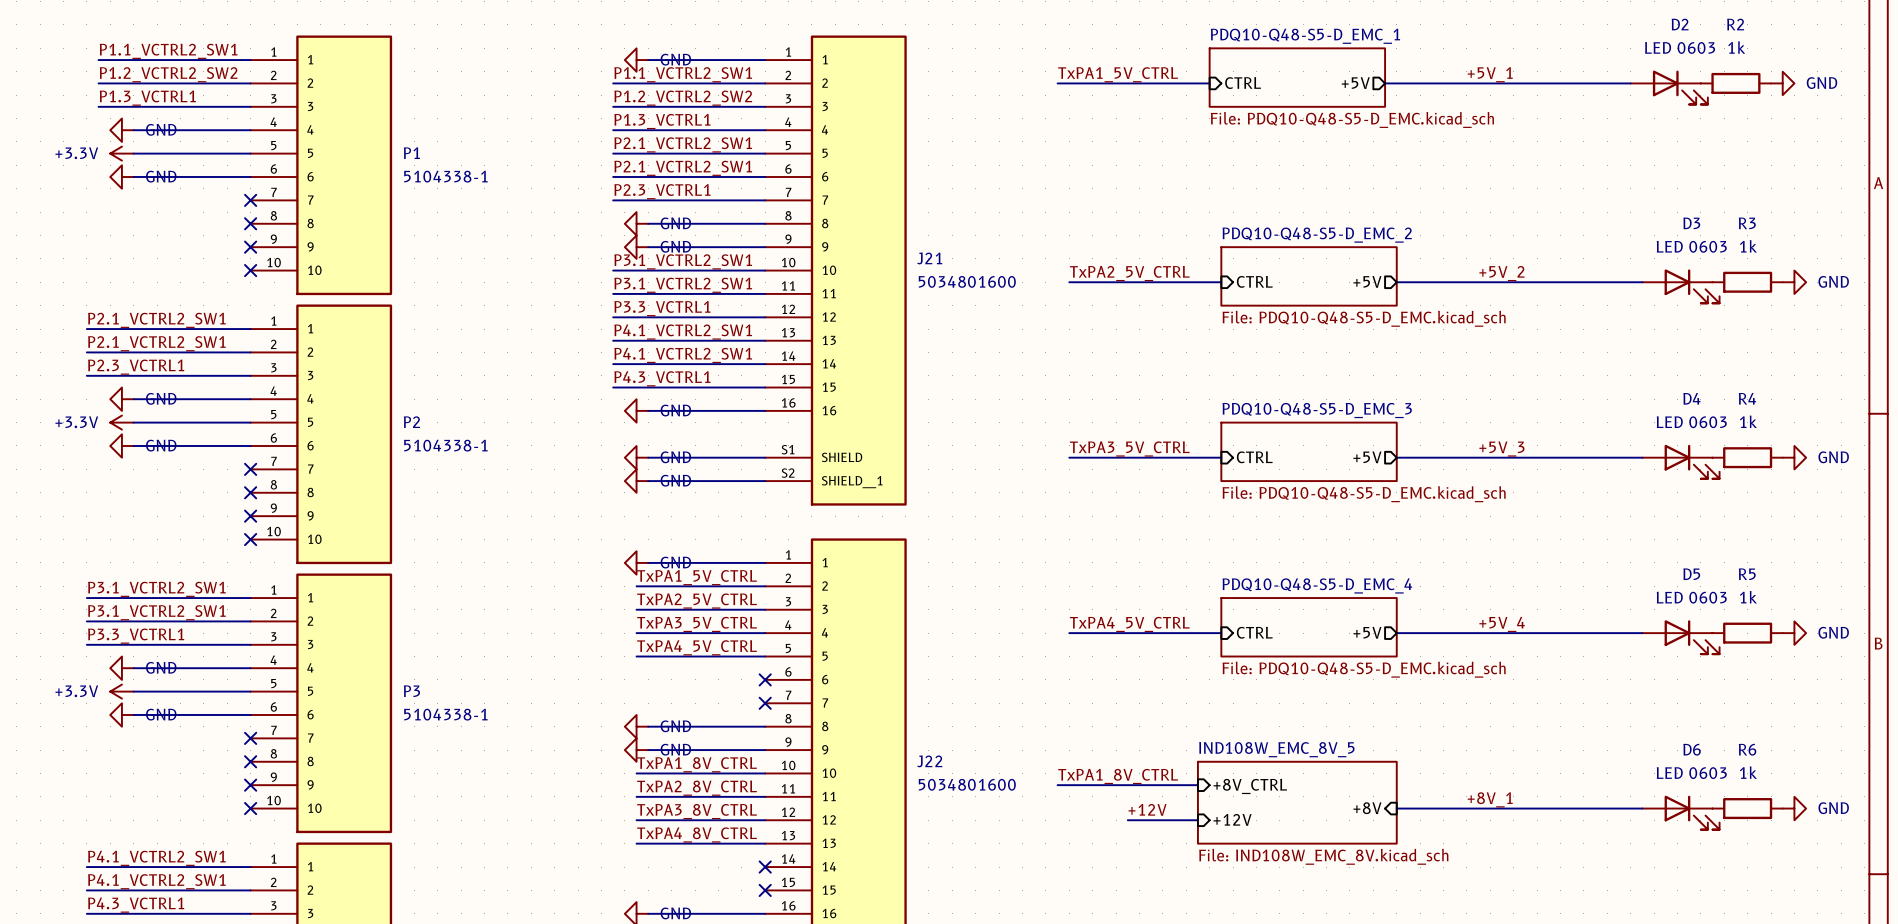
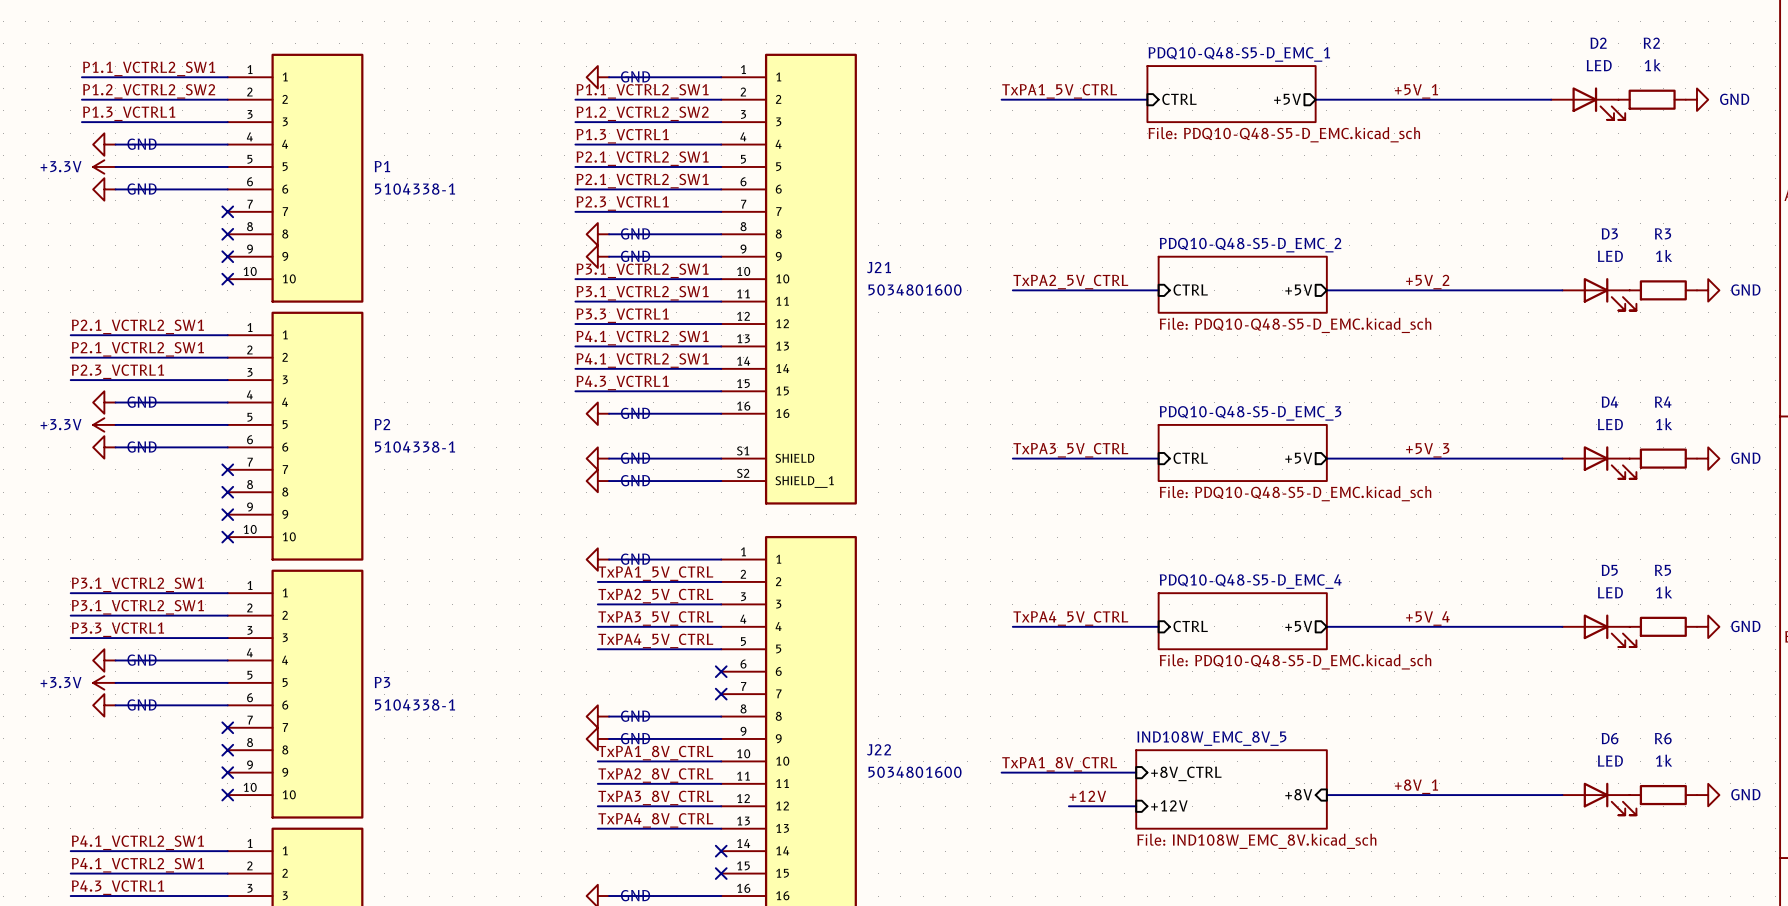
D2 value: LED 0603 (1680, 47) -> LED (1599, 65)
D3 value: LED 0603 (1691, 246) -> LED (1610, 256)
D4 value: LED 0603 (1691, 422) -> LED (1610, 424)
D5 value: LED 0603 (1691, 597) -> LED (1610, 592)
D6 value: LED 0603 (1691, 773) -> LED (1610, 761)

